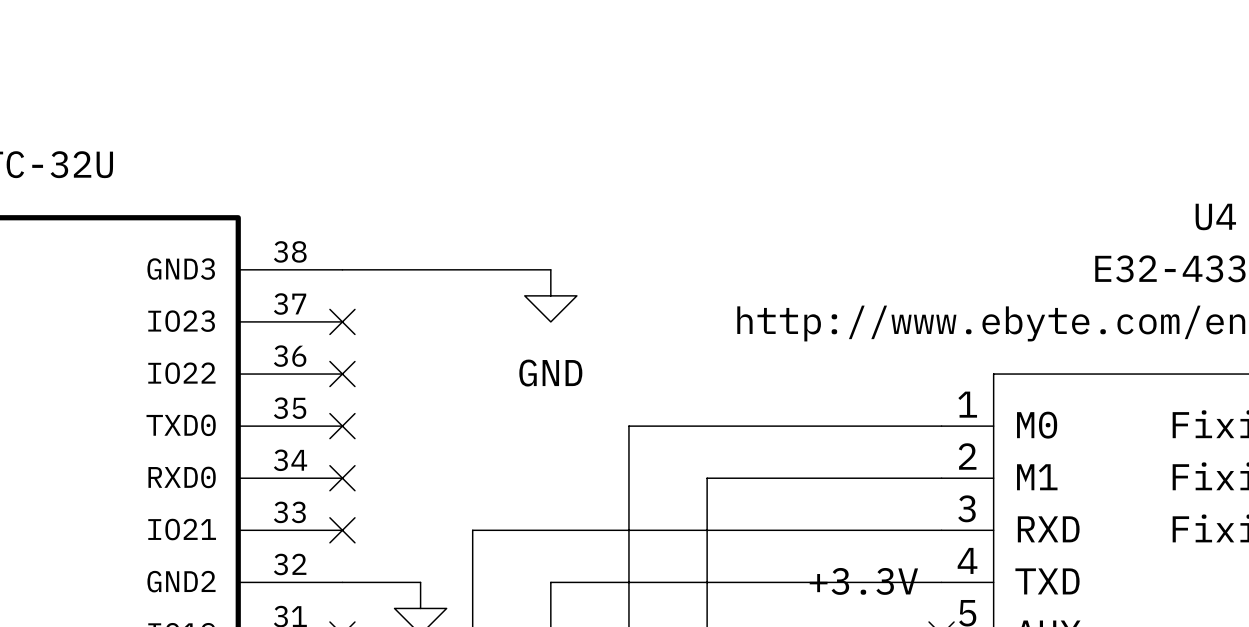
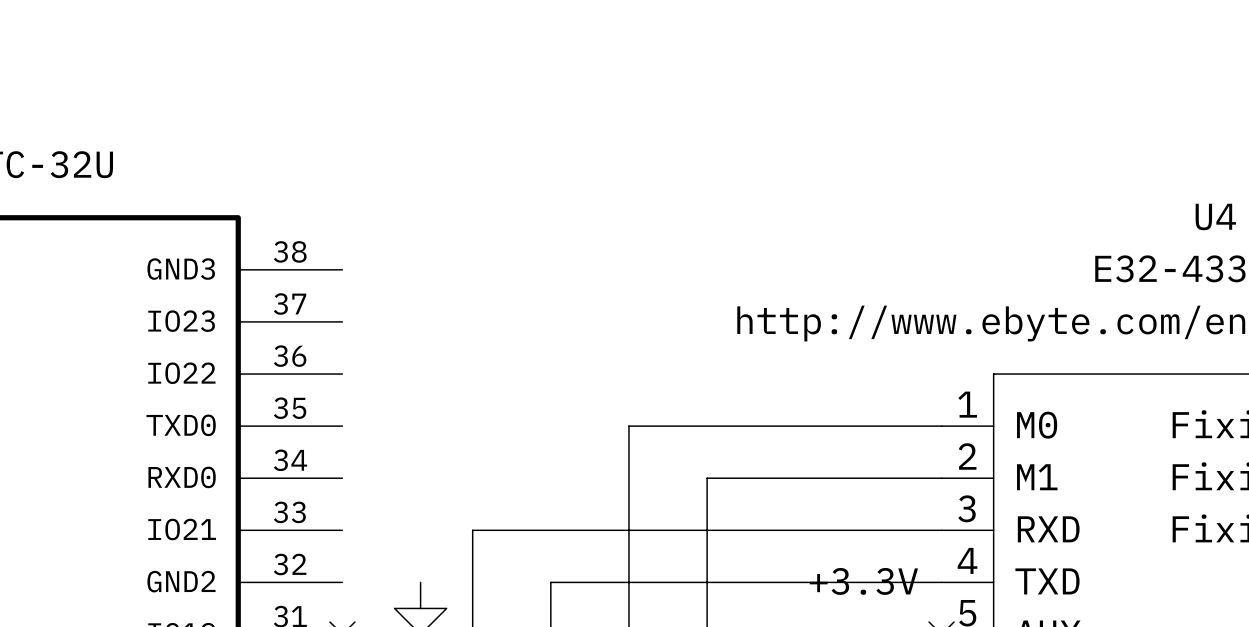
wire: (342, 269) (550, 269) -> none
power symbol: GND (550, 295) -> none
no-connect mark: (342, 321) -> none
no-connect mark: (342, 374) -> none
no-connect mark: (342, 426) -> none
no-connect mark: (342, 478) -> none
no-connect mark: (342, 530) -> none
wire: (342, 582) (420, 582) -> none

